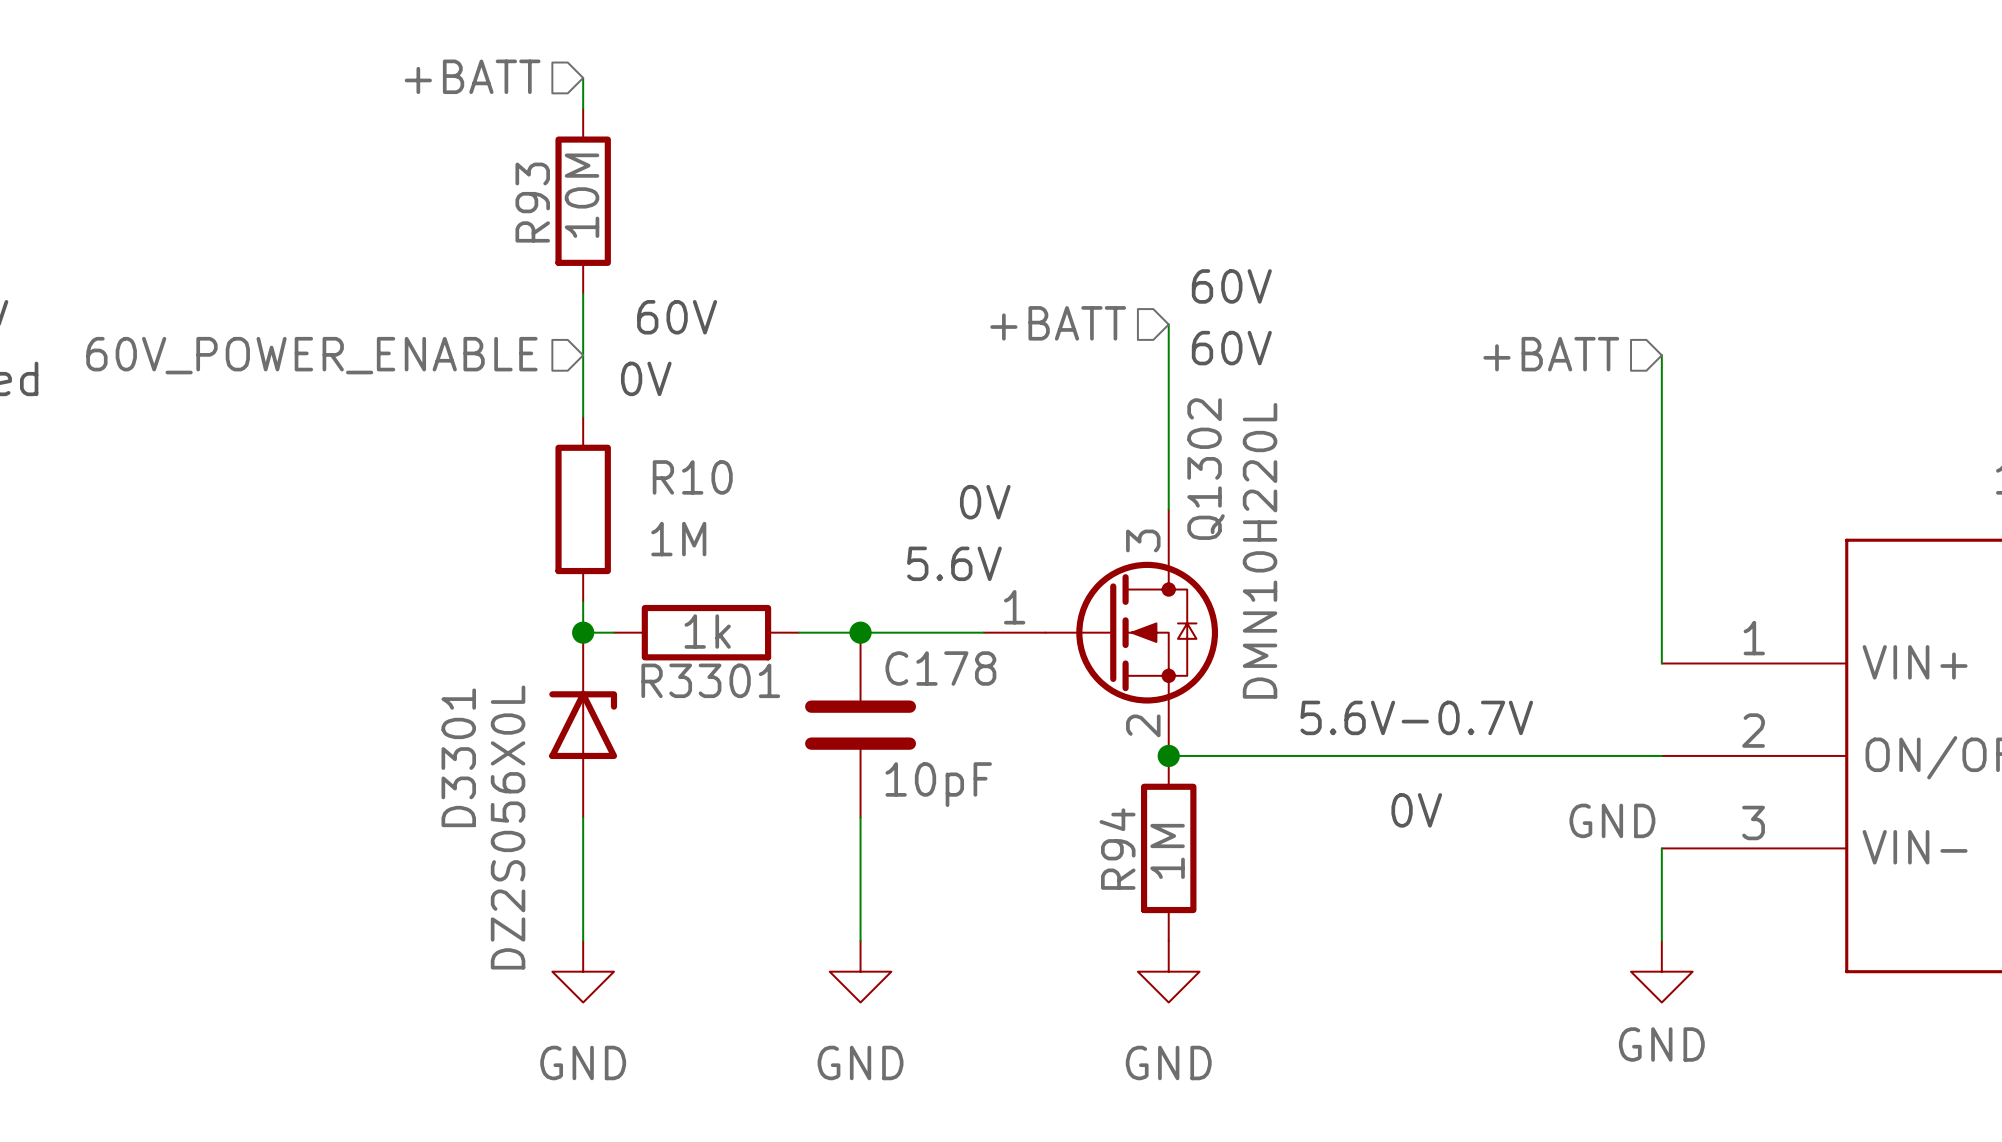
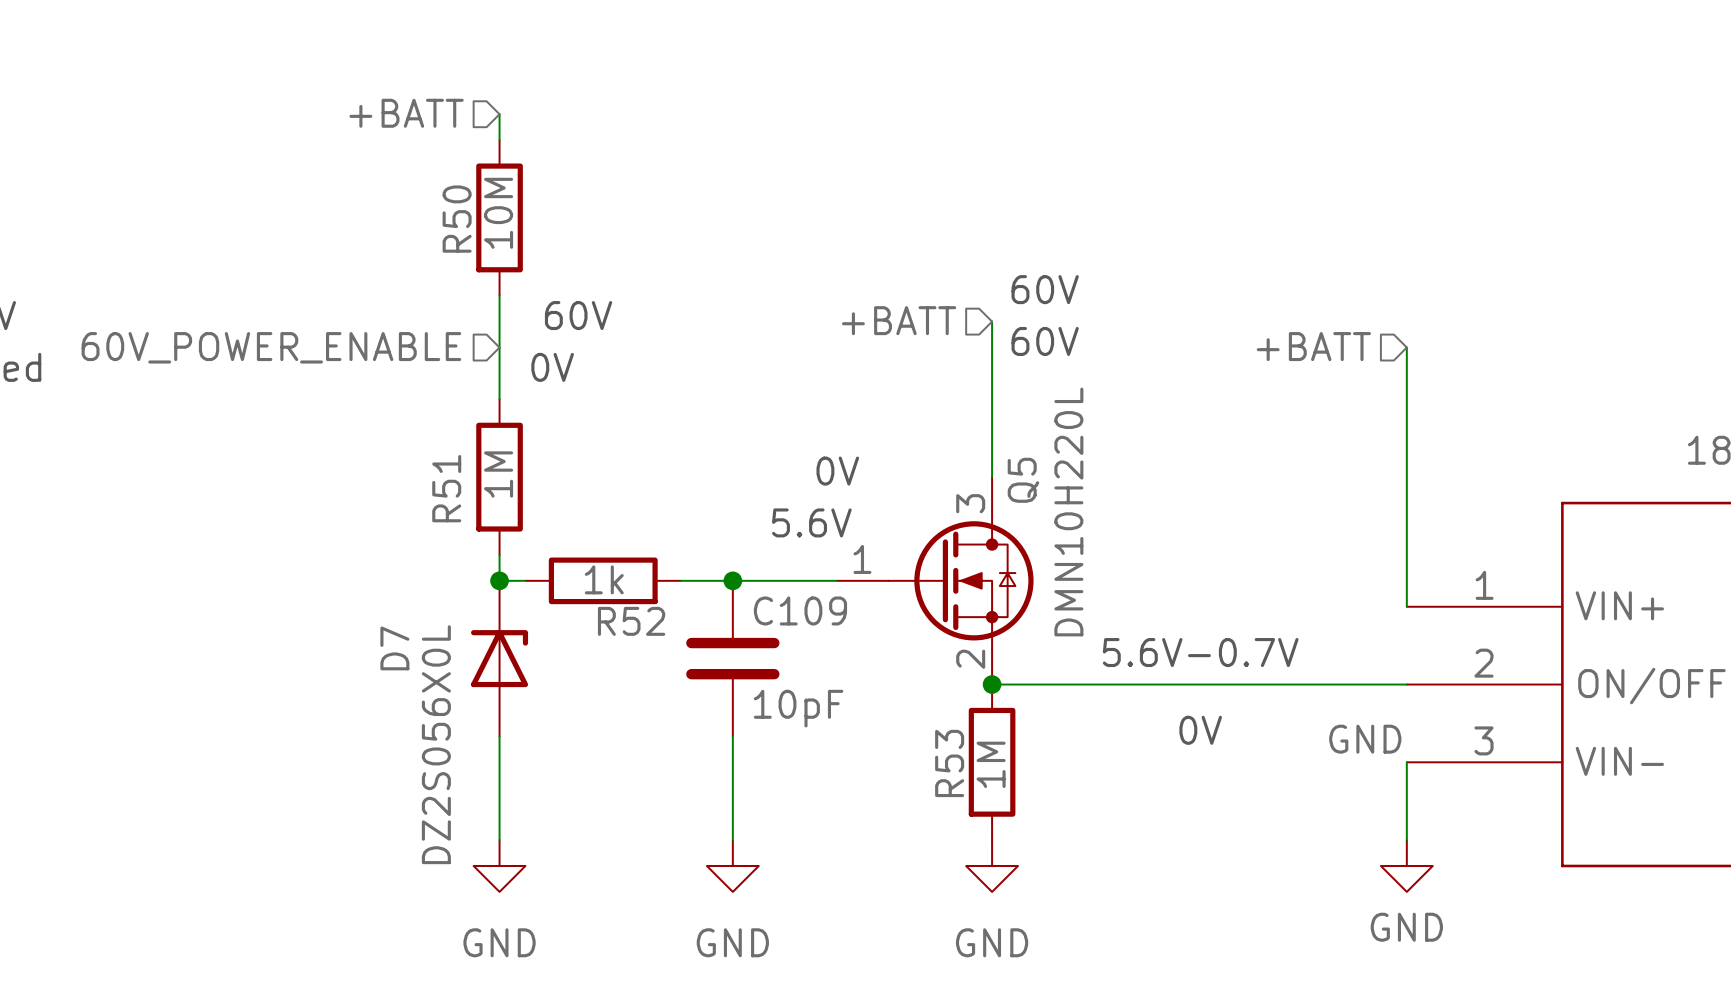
R93 name: R93 (532, 202) -> R50 (457, 219)
Q1302 name: Q1302 (1206, 469) -> Q5 (1023, 480)
R10 name: R10 (692, 477) -> R51 (446, 488)
R10 value rotation: 0° (678, 539) -> 90° counterclockwise (498, 474)
R10 value position: 1M (678, 539) -> 1M (498, 474)
C178 name: C178 (940, 668) -> C109 (800, 610)
R3301 name: R3301 (710, 680) -> R52 (631, 621)
D3301 name: D3301 (458, 757) -> D7 (394, 648)
R94 name: R94 (1117, 849) -> R53 (949, 763)

